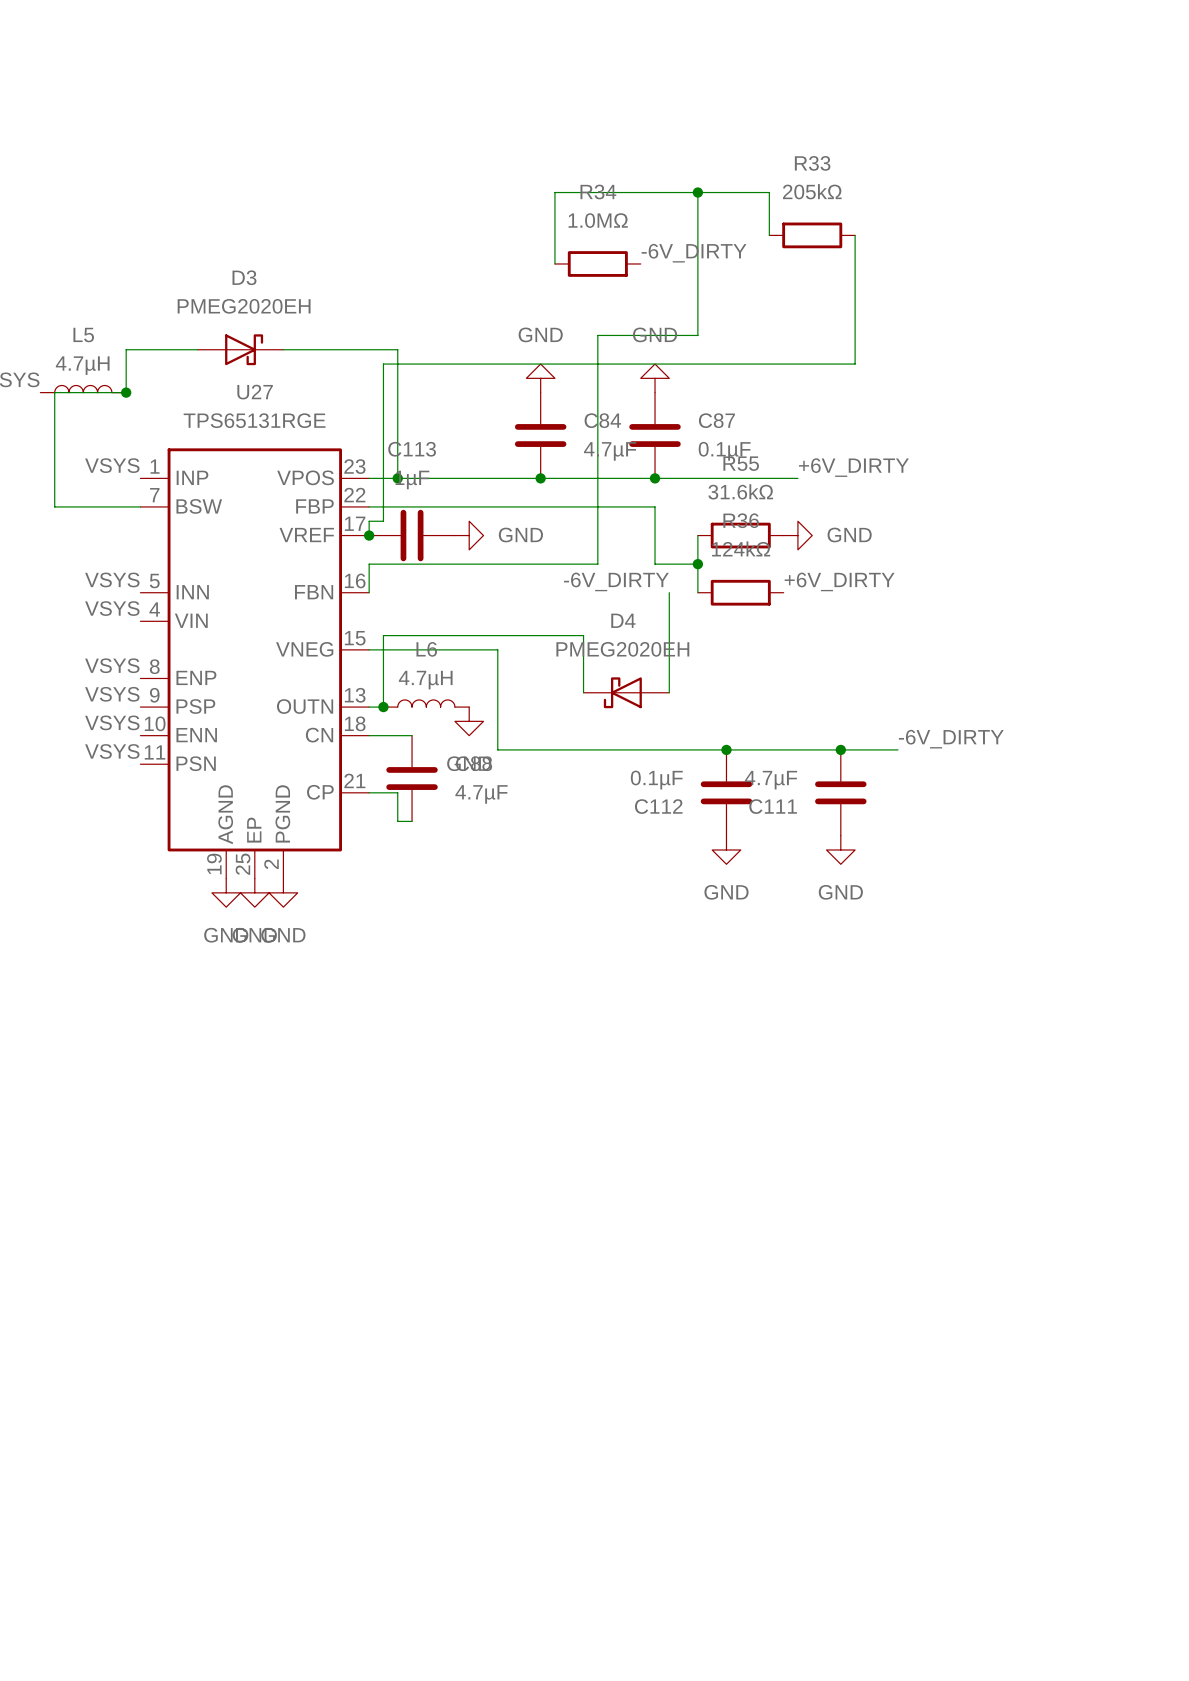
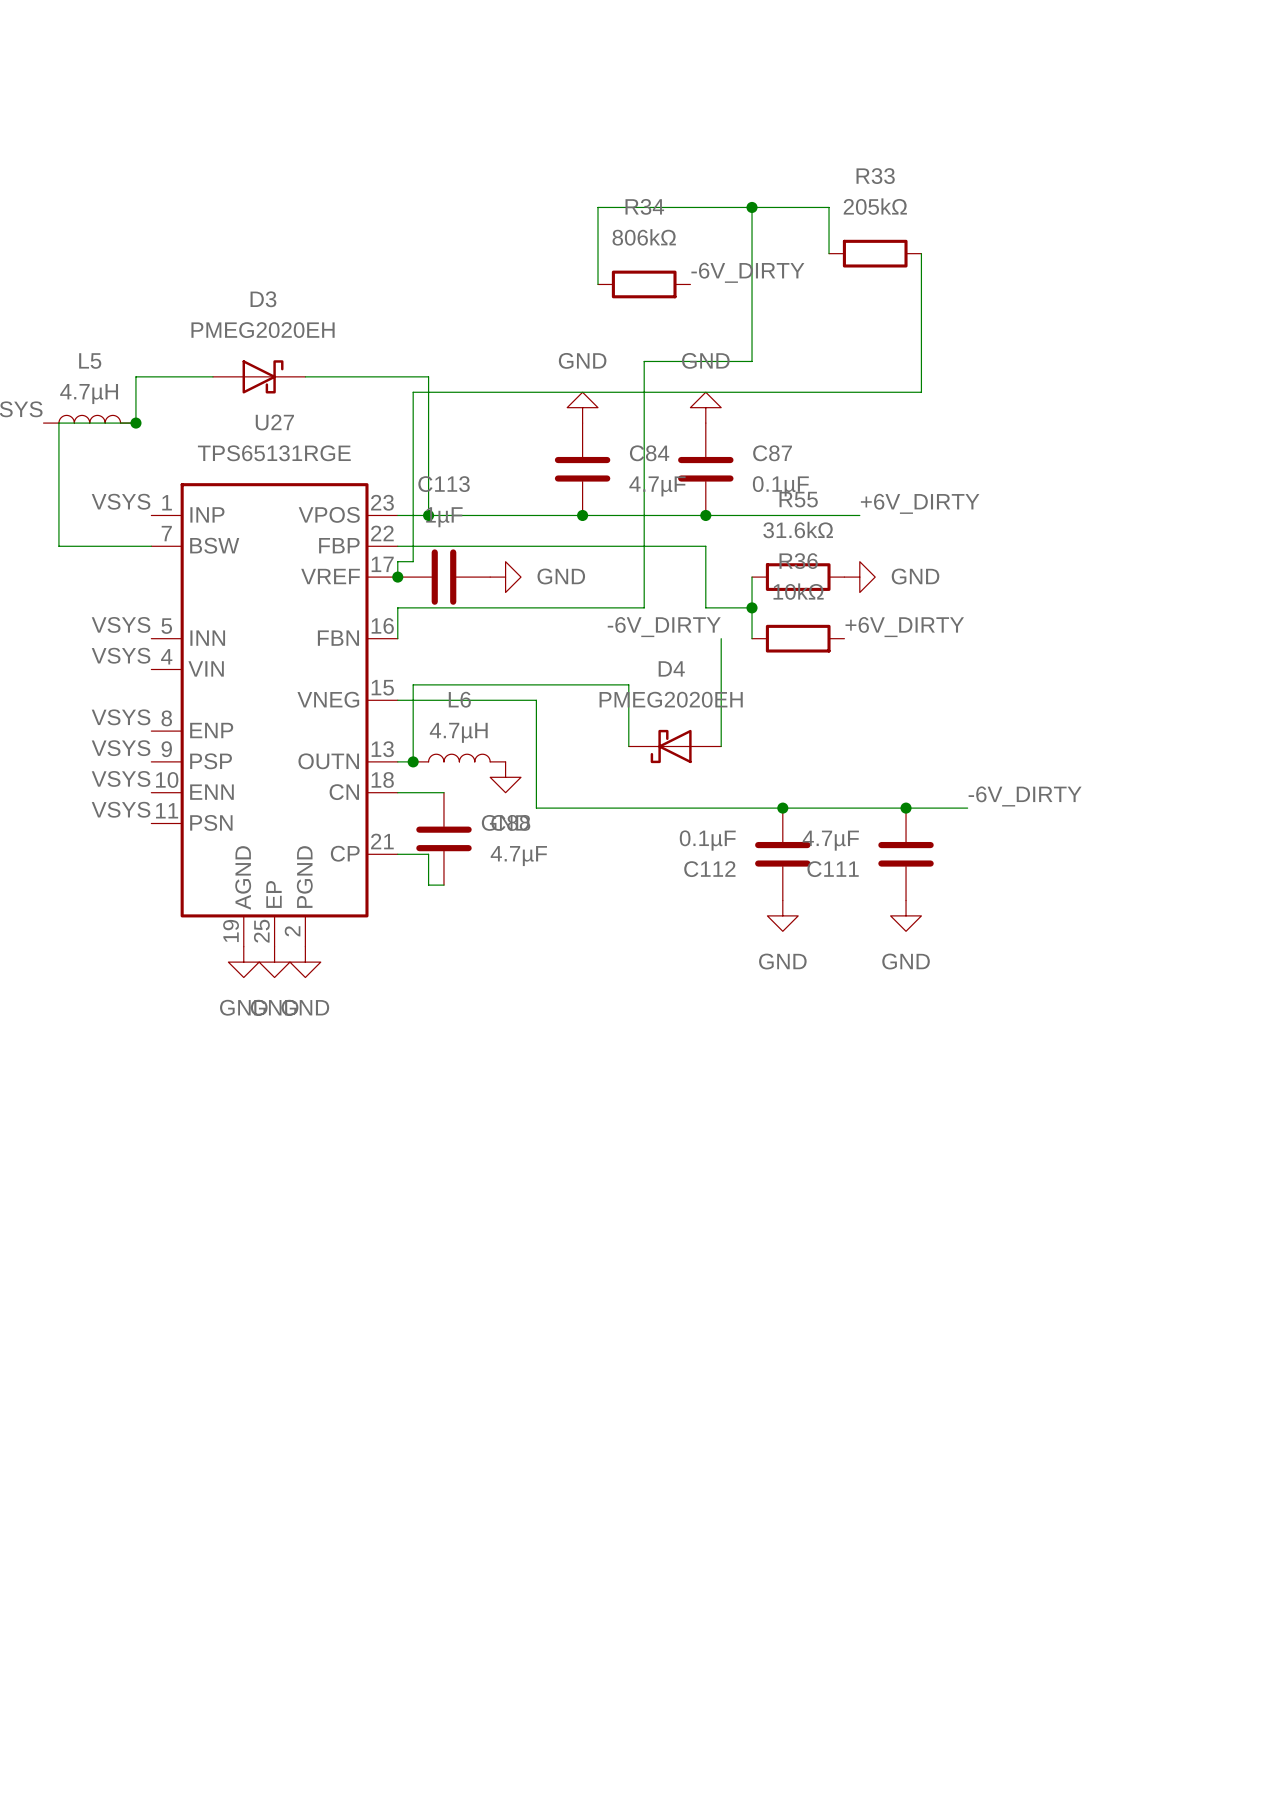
R34 value: 1.0MΩ (598, 220) -> 806kΩ (644, 237)
R36 value: 124kΩ (741, 548) -> 10kΩ (798, 591)

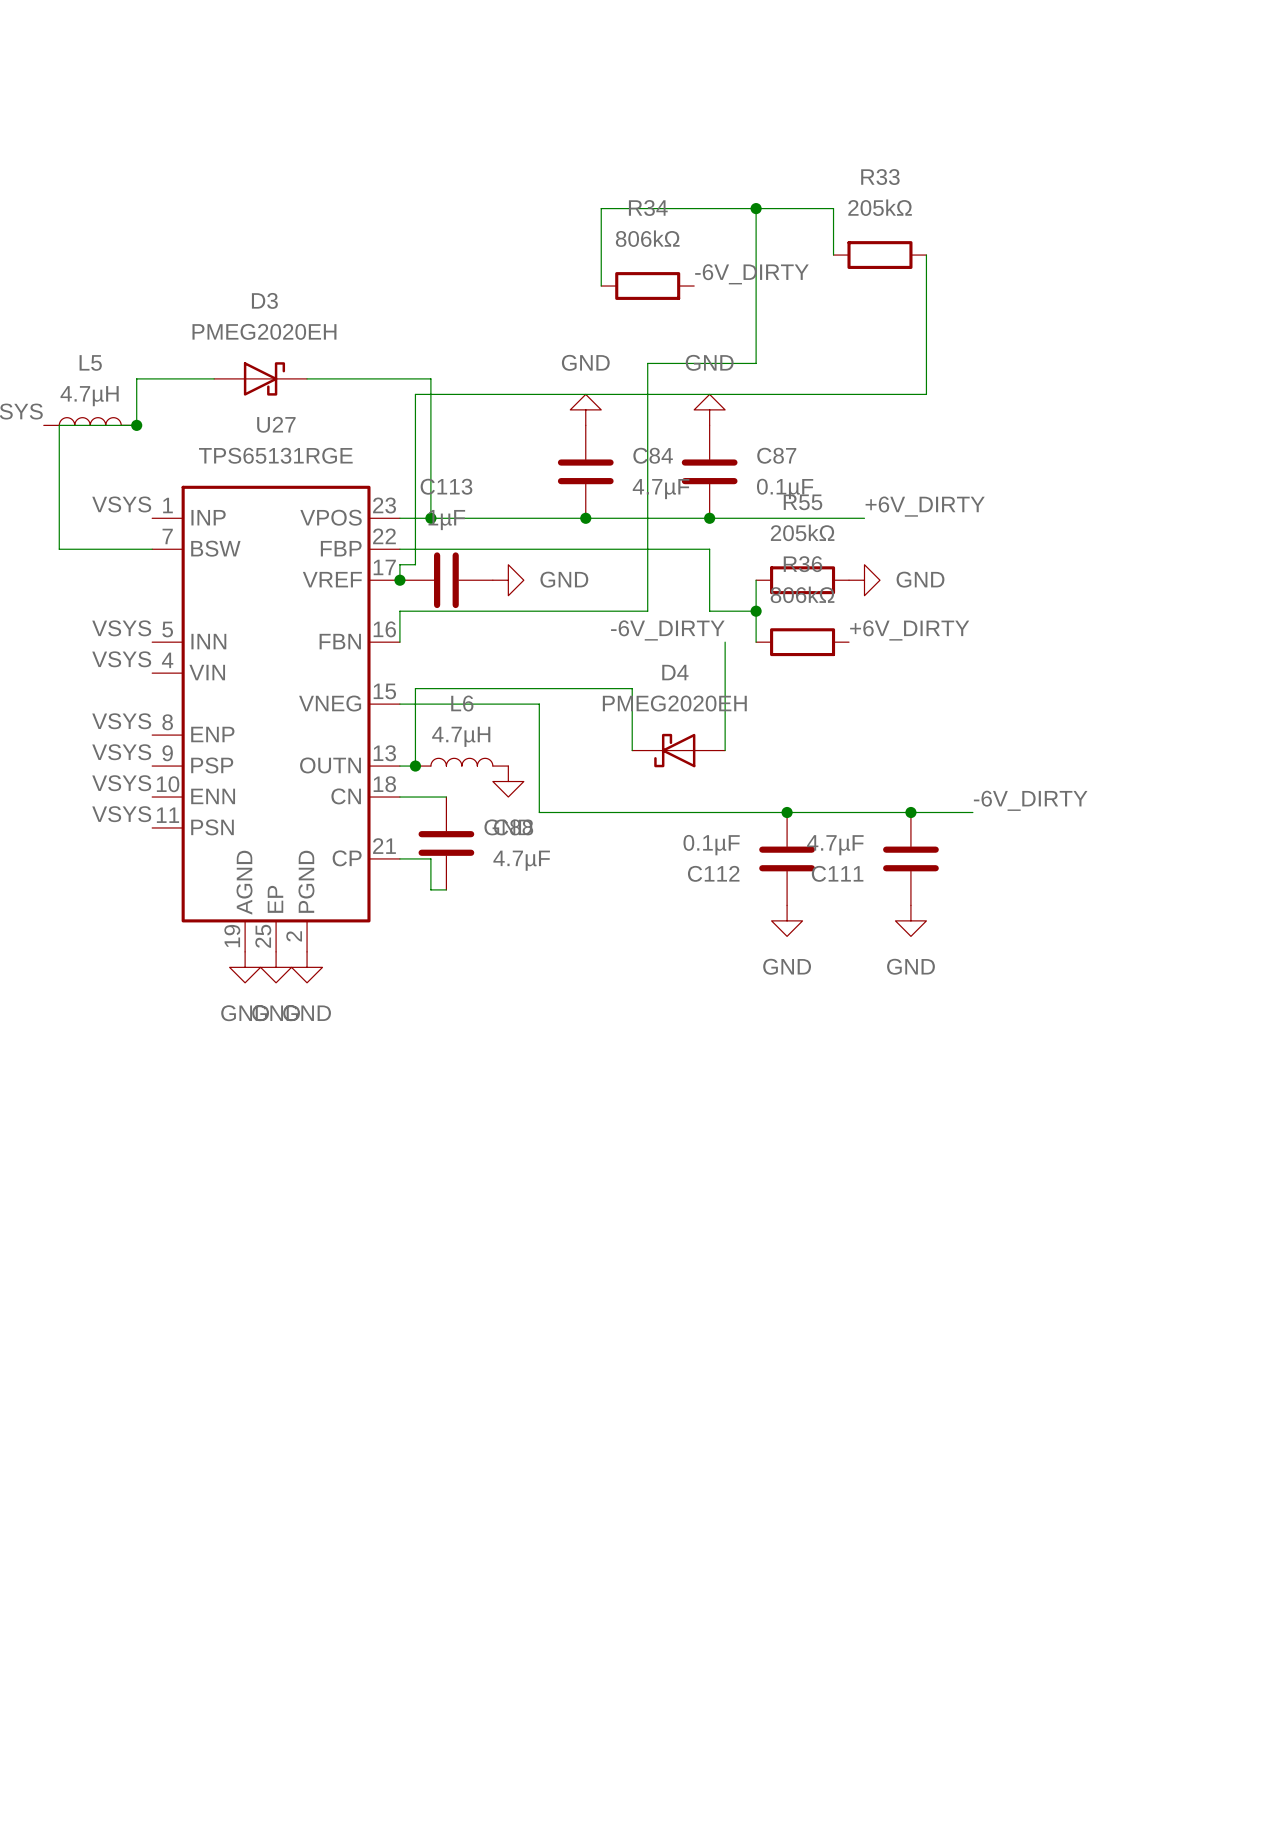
R55 value: 31.6kΩ (798, 530) -> 205kΩ (802, 532)
R36 value: 10kΩ (798, 591) -> 806kΩ (802, 594)

